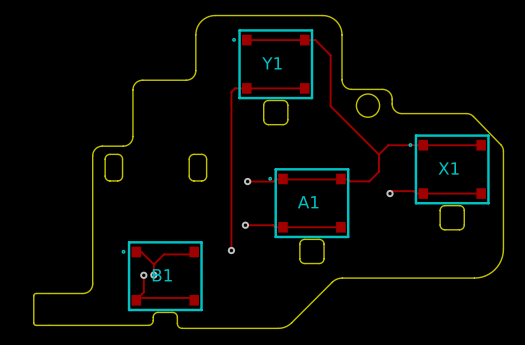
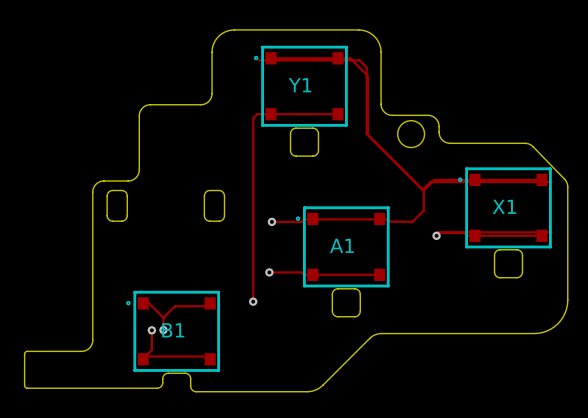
track: none -> (258, 60) (359, 60) (366, 67) (366, 134) (422, 189) (430, 182) (551, 182)
track: none -> (551, 232) (438, 232) (435, 235)

